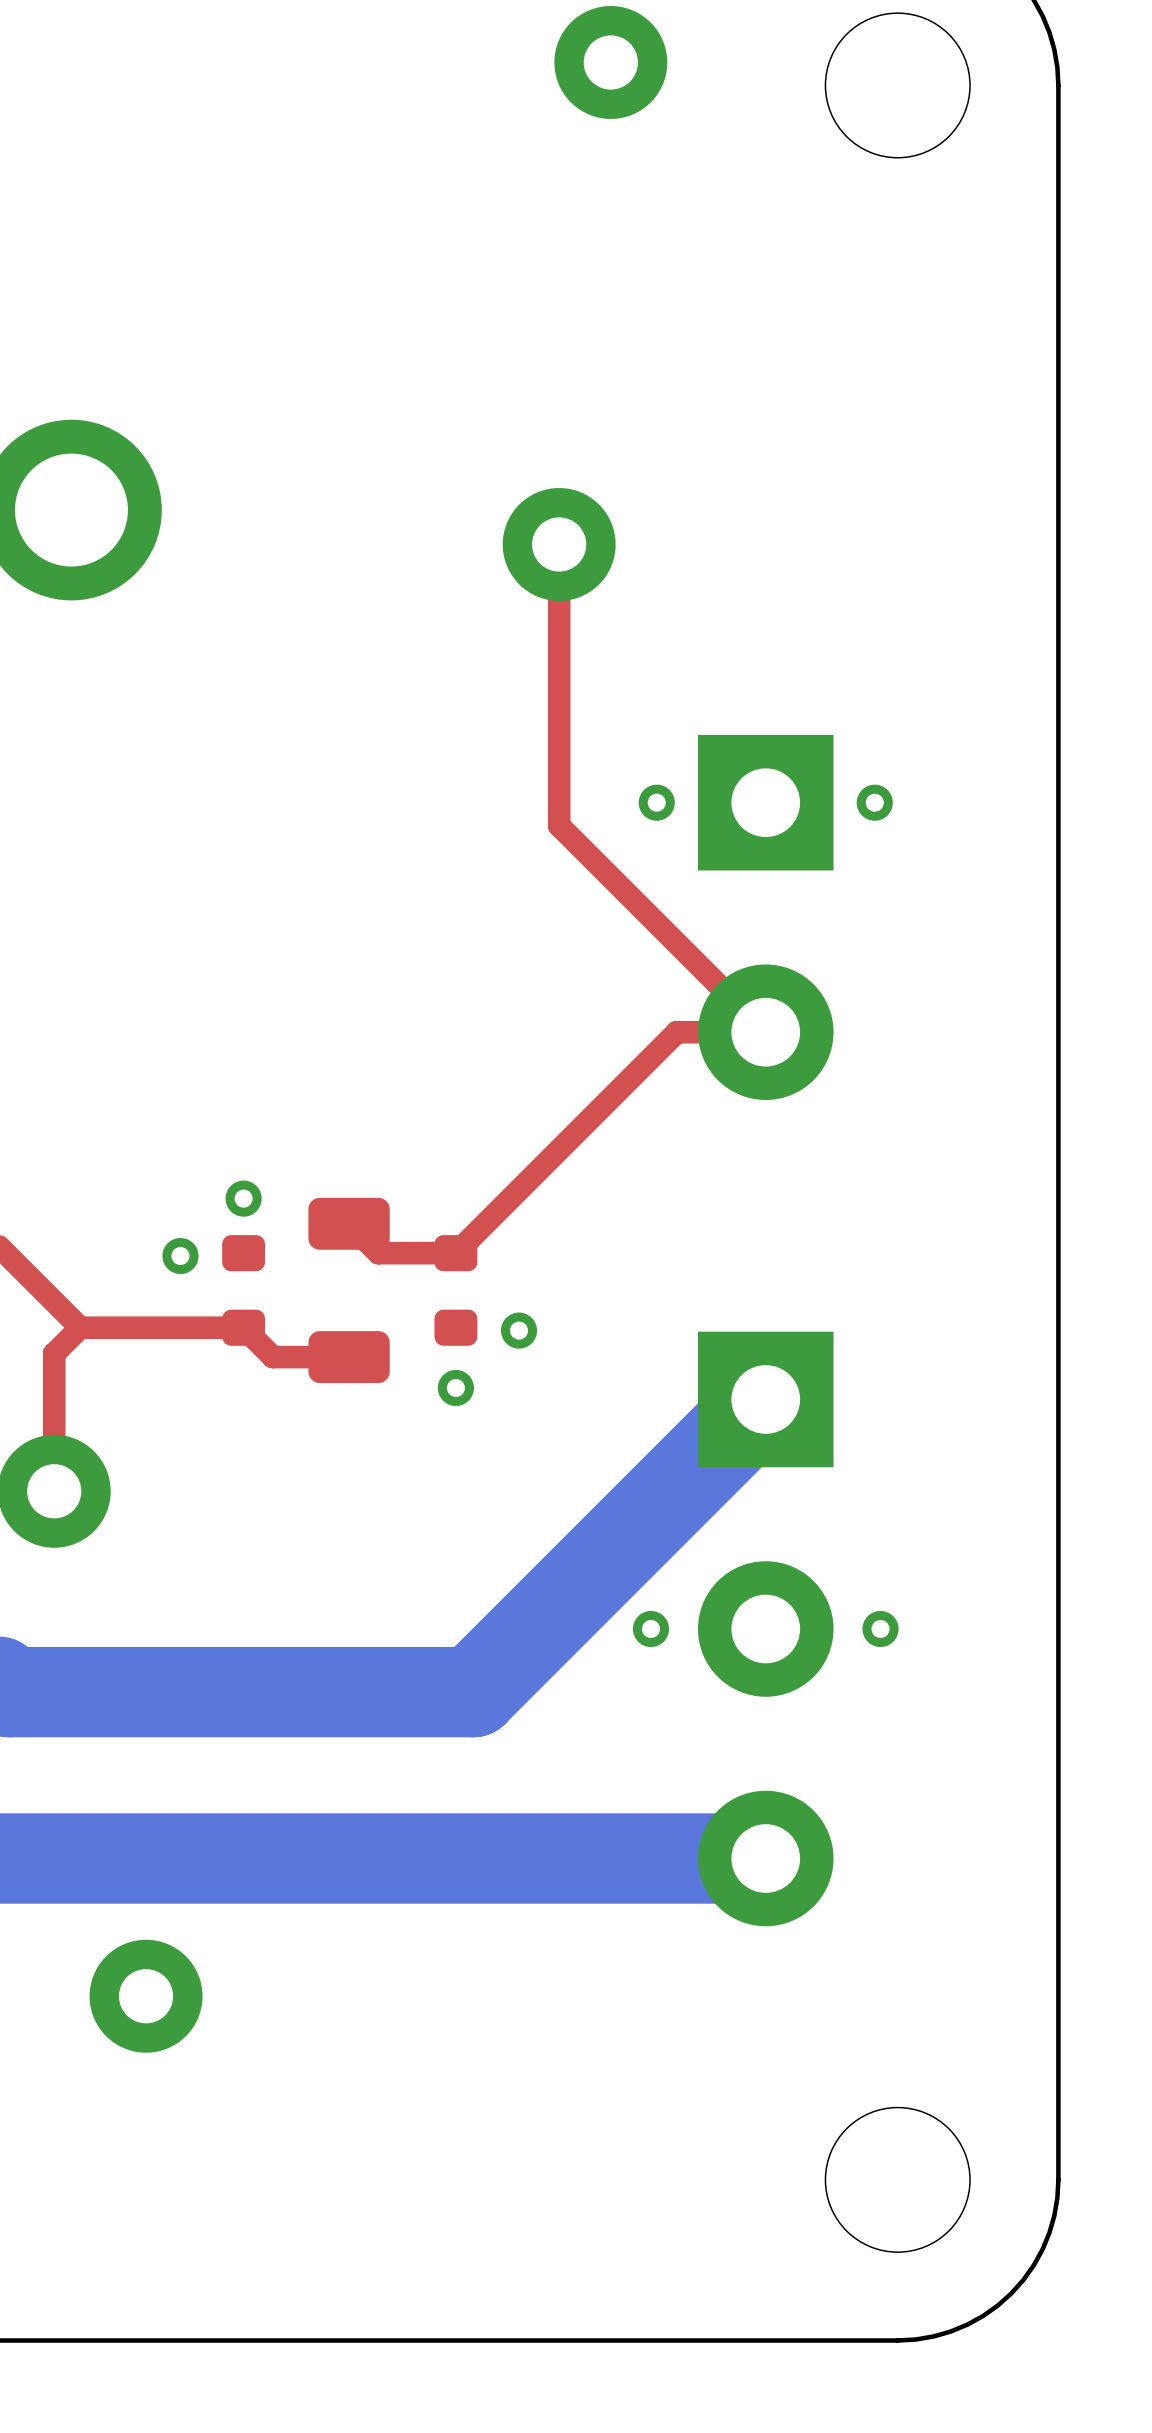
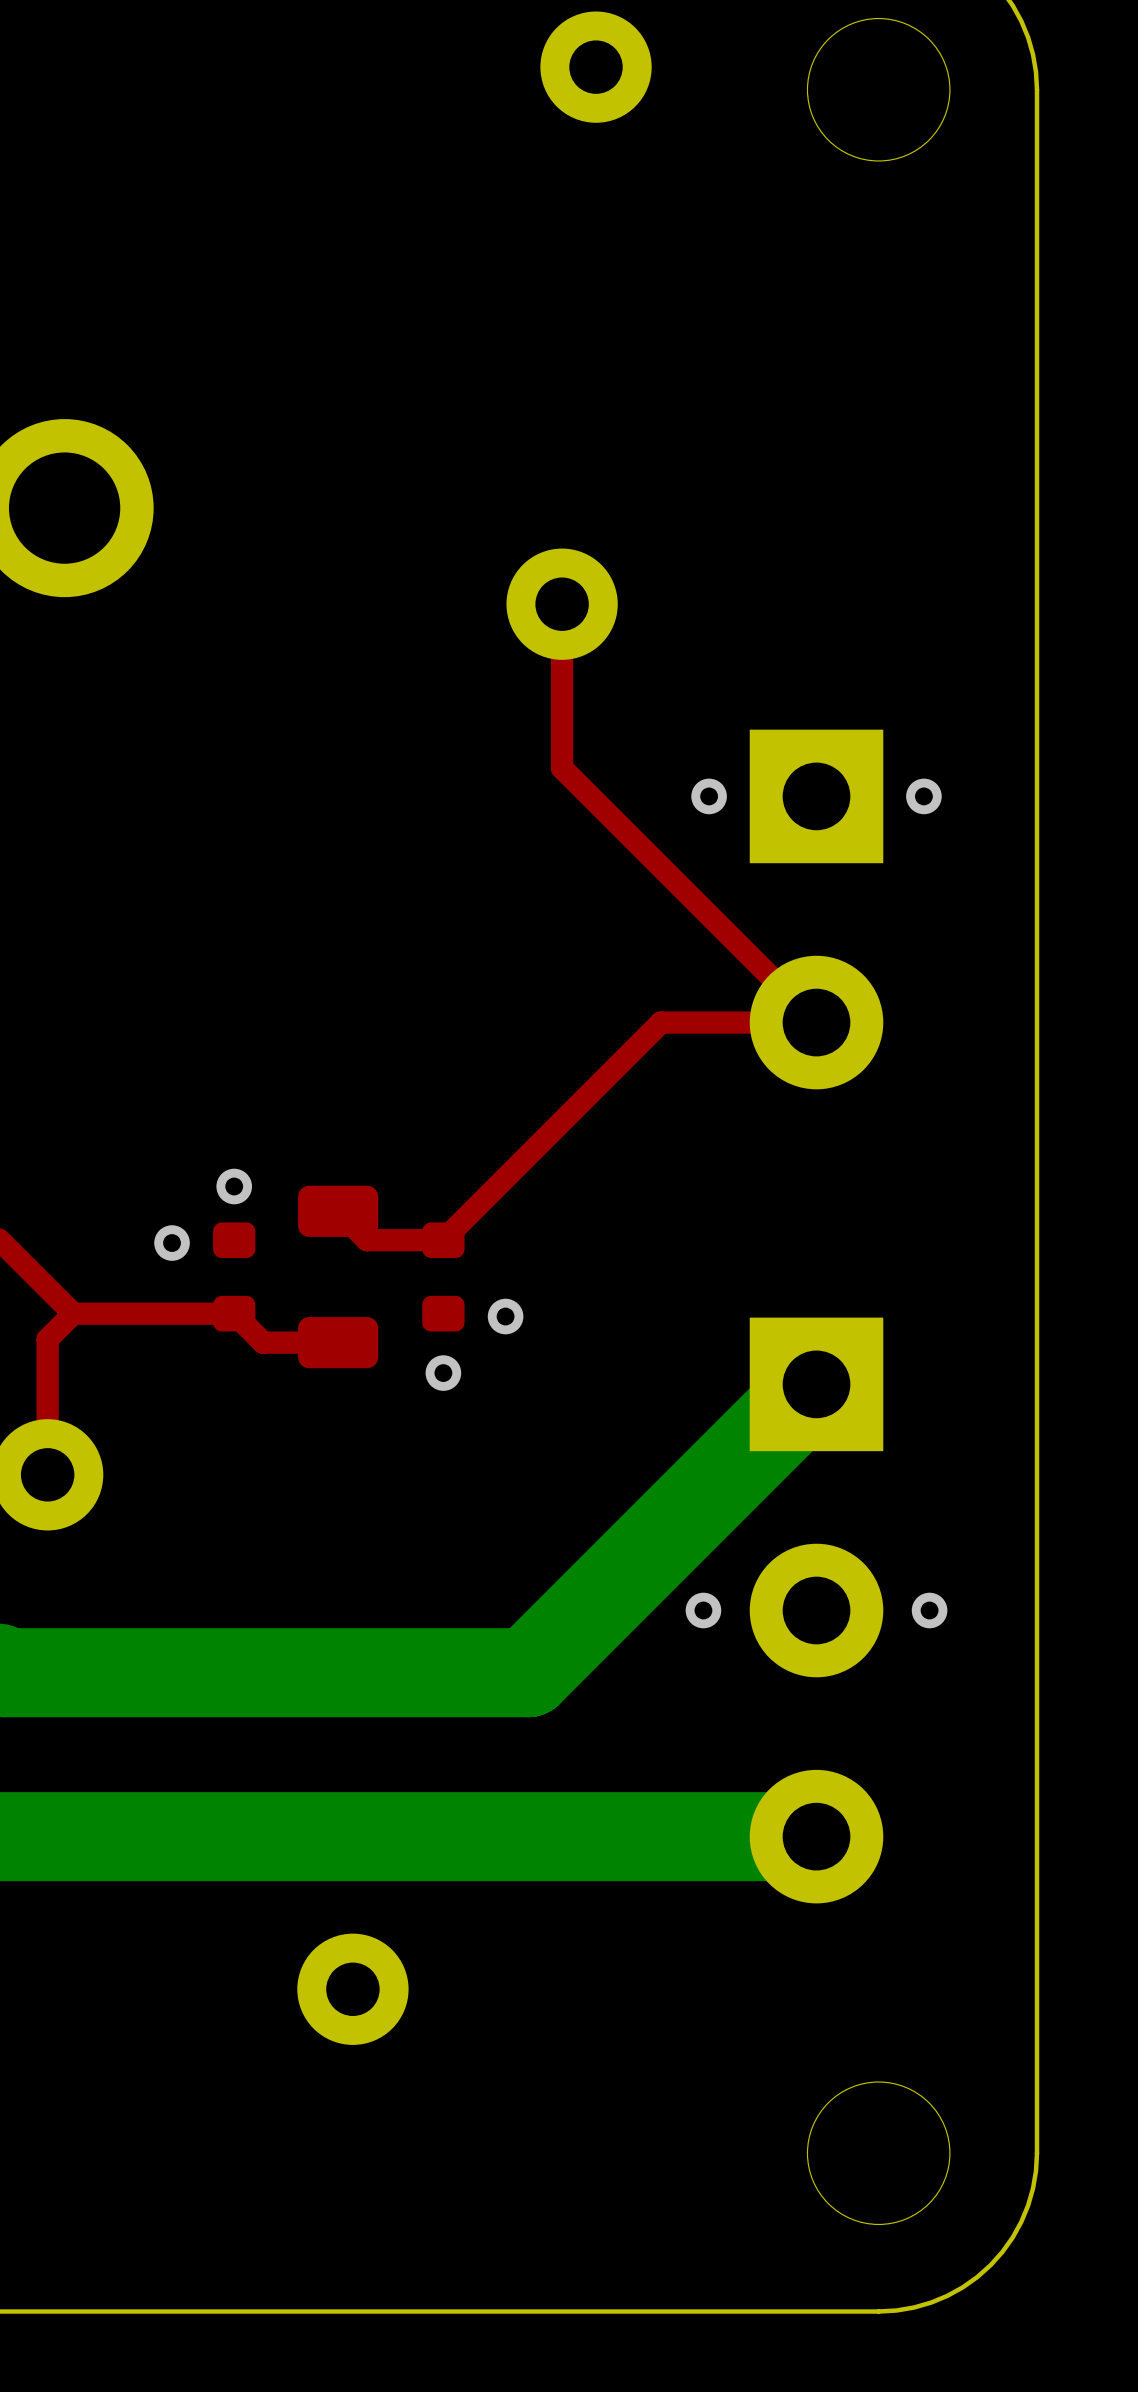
top track: (559, 544) (559, 825) (765, 1032) -> (562, 604) (562, 768) (816, 1022) (748, 1022)
part position: (559, 544) -> (562, 604)
via position: (656, 802) -> (709, 796)
via position: (874, 802) -> (923, 796)
part position: (765, 917) -> (816, 909)
bottom track: (765, 1399) (473, 1692) -> (816, 1384) (528, 1672) (460, 1672)
via position: (651, 1629) -> (703, 1610)
part position: (765, 1629) -> (816, 1610)
via position: (880, 1629) -> (929, 1610)
part position: (146, 1996) -> (352, 1989)

